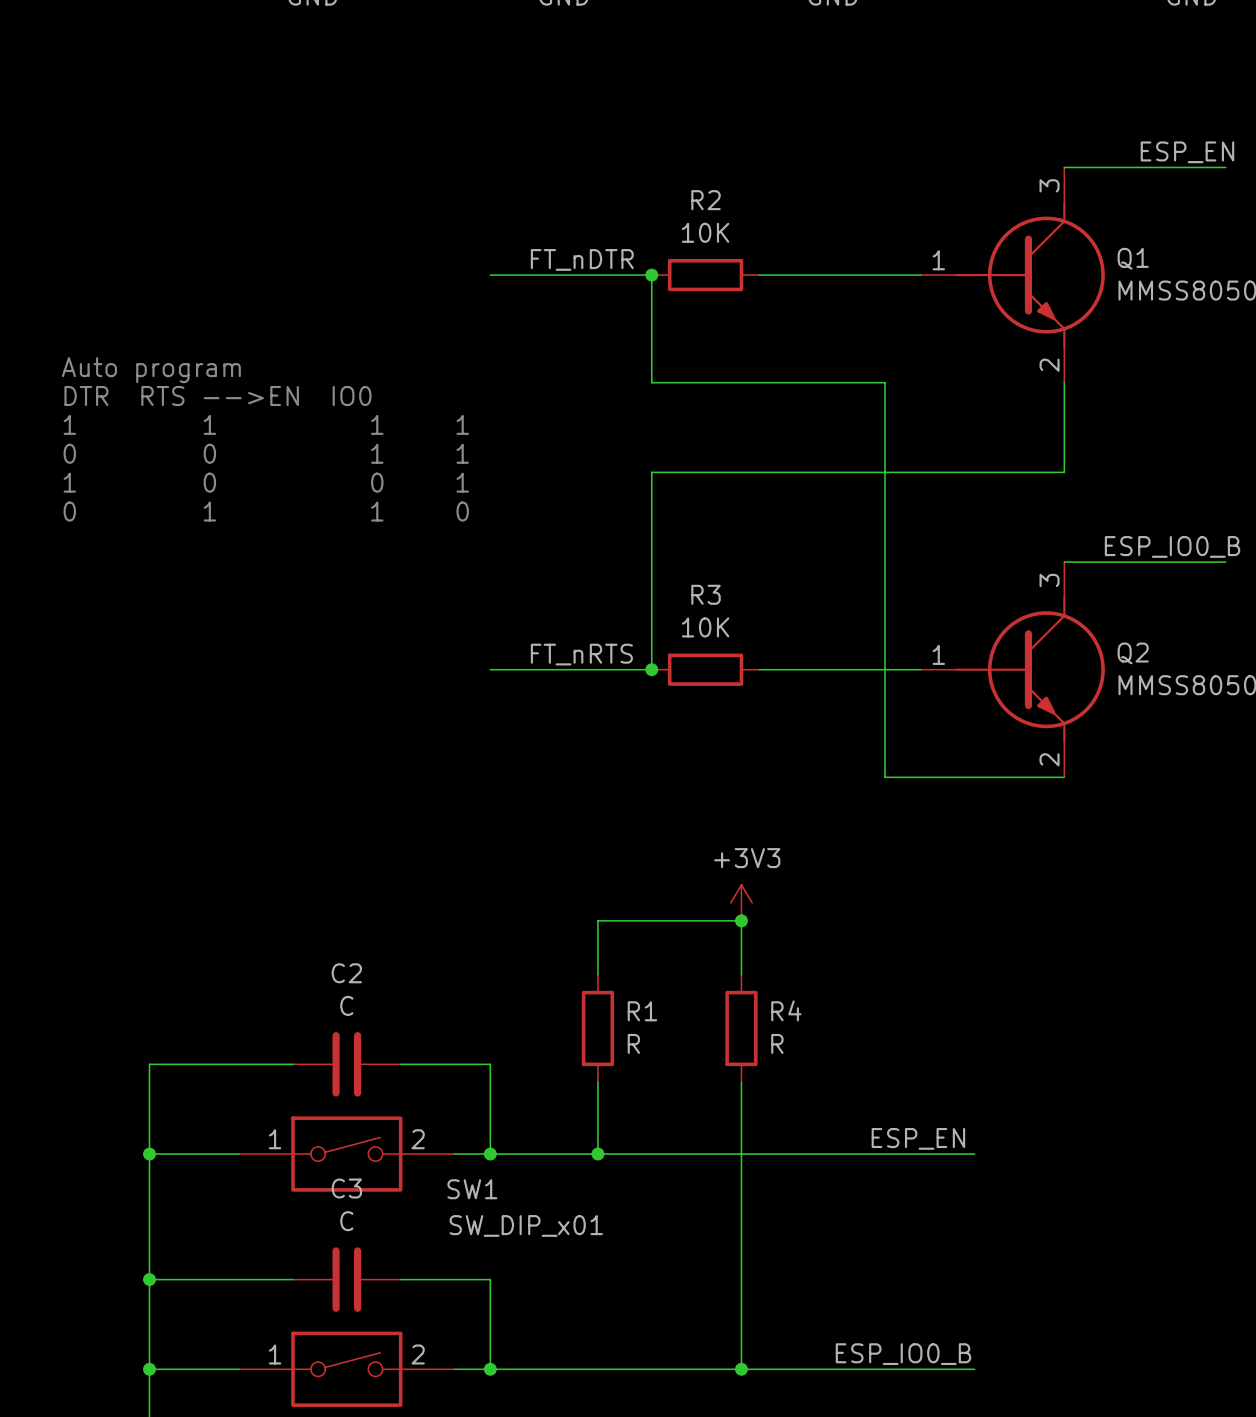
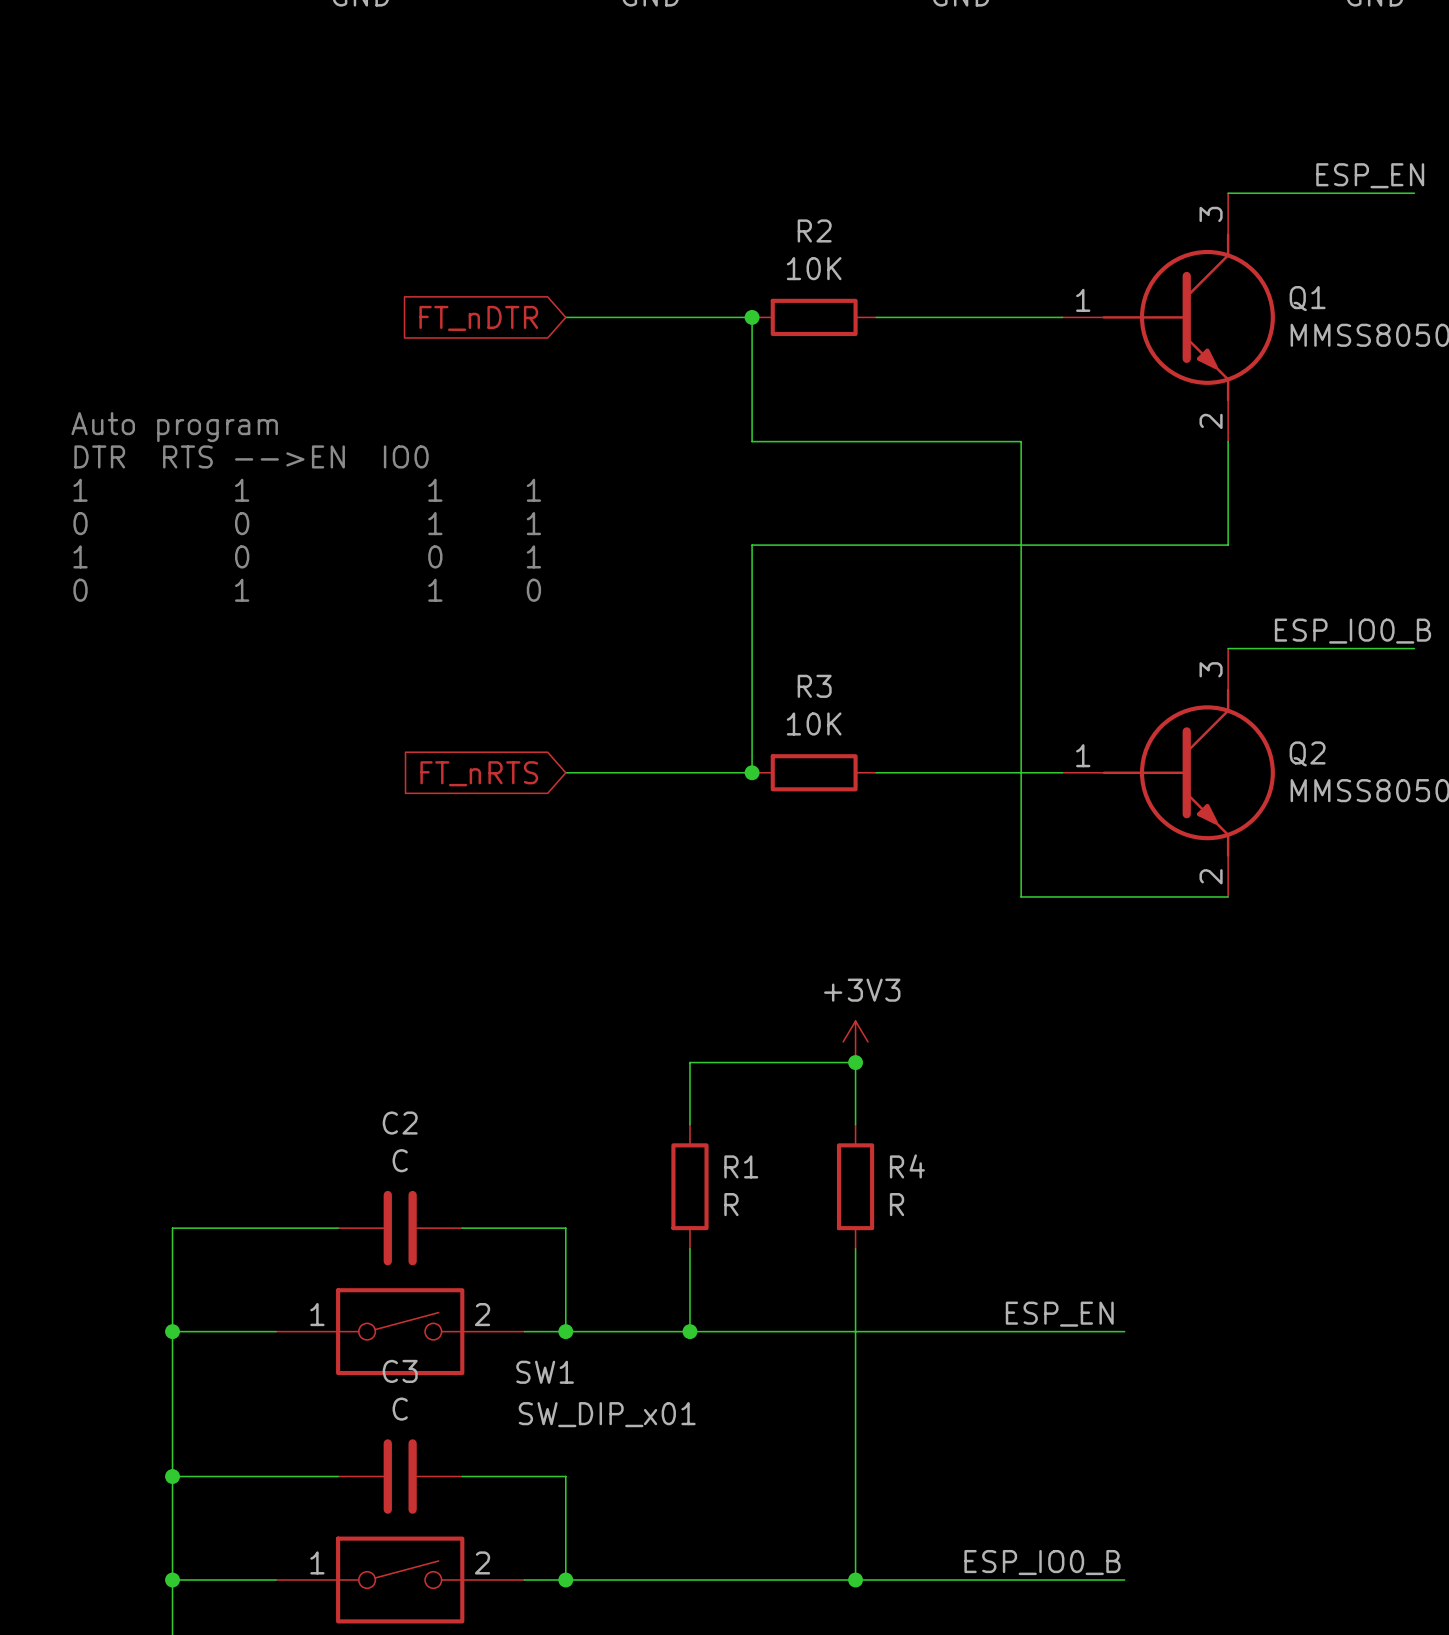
label: FT_nDTR (582, 259) -> none
global label: none -> FT_nDTR (478, 318)
label: FT_nRTS (581, 654) -> none
global label: none -> FT_nRTS (479, 773)

